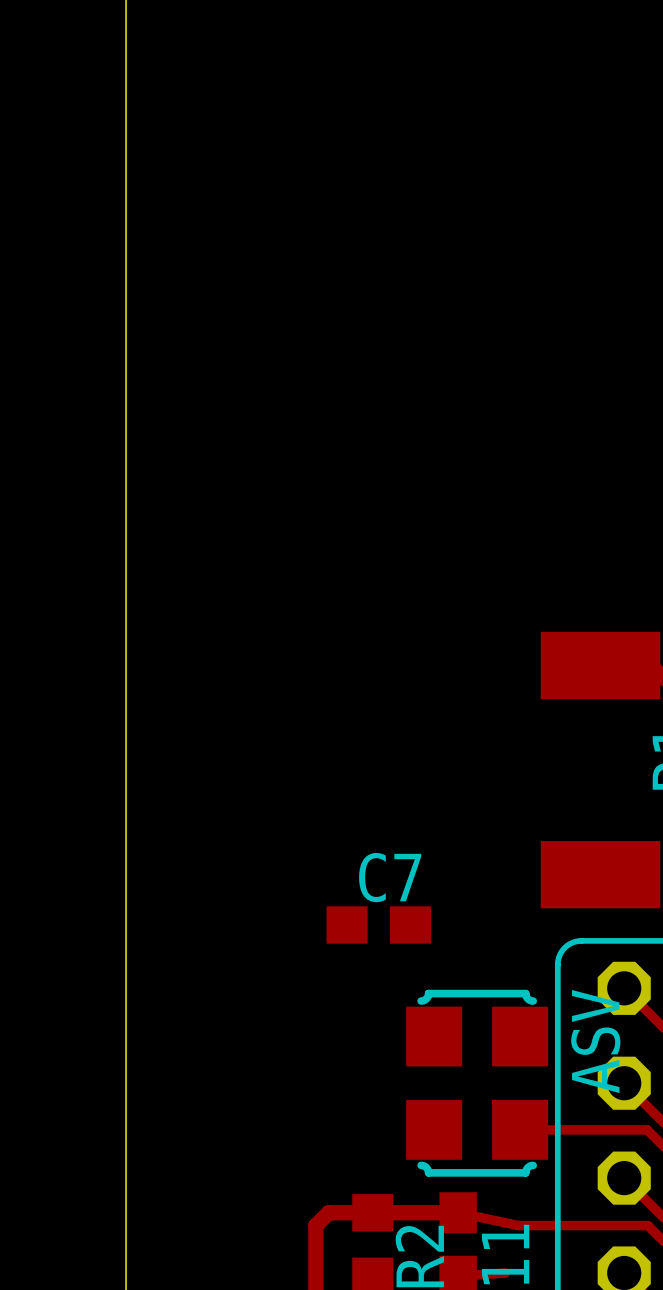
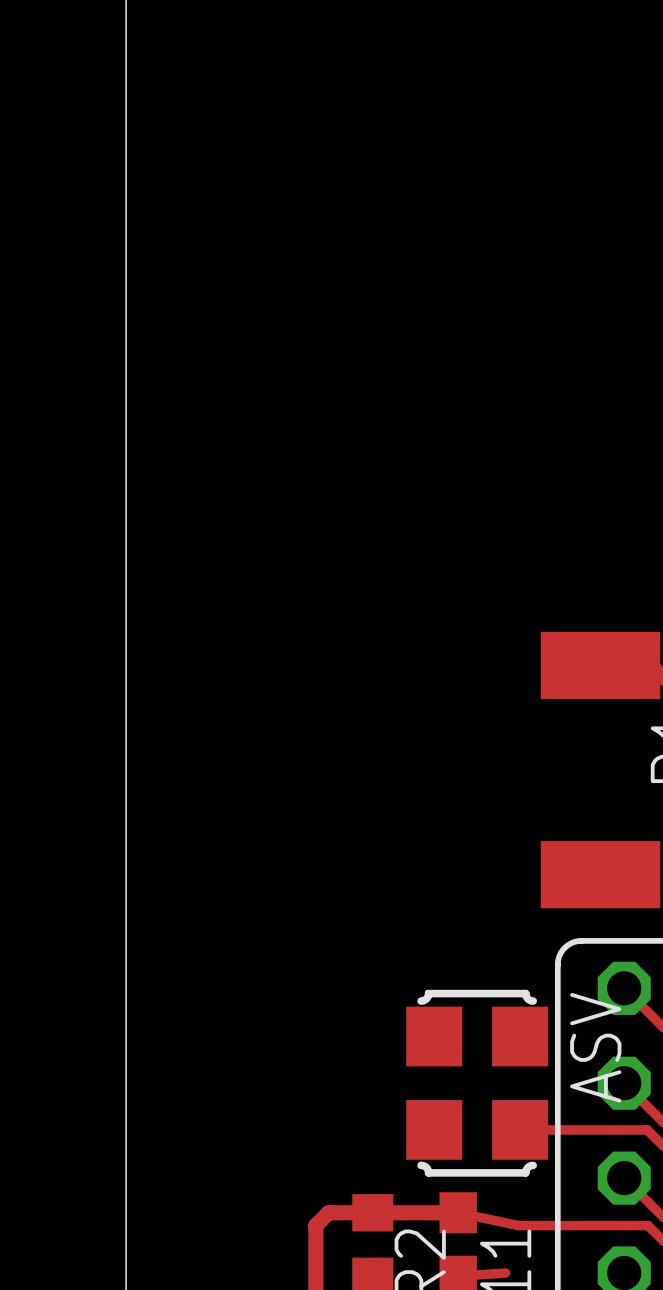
C7: (378, 924) -> none

